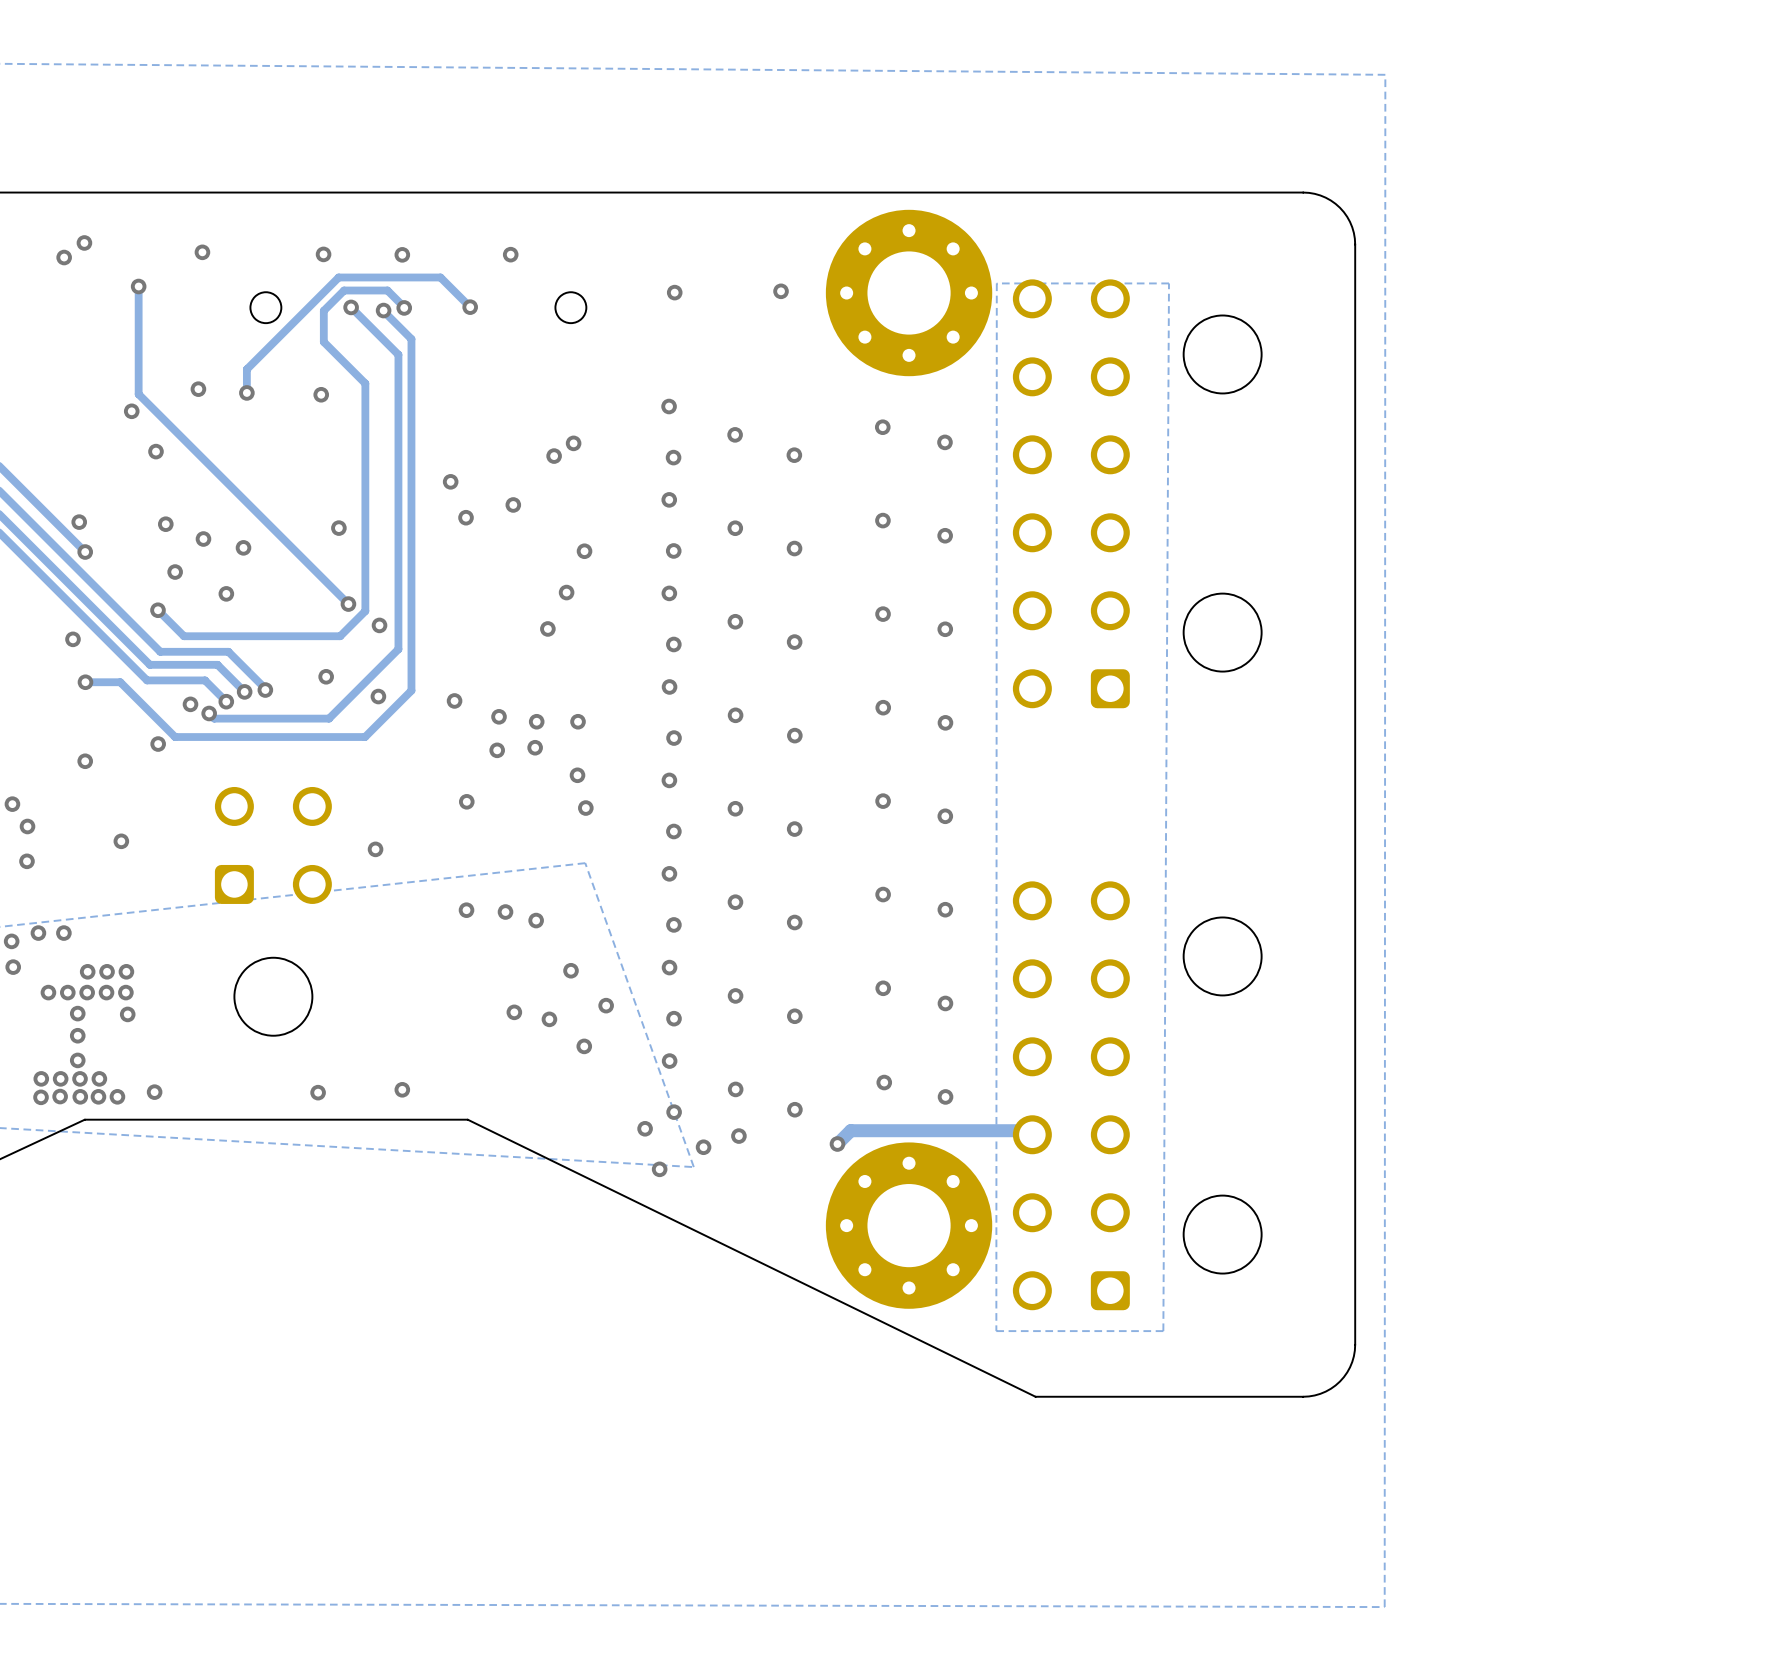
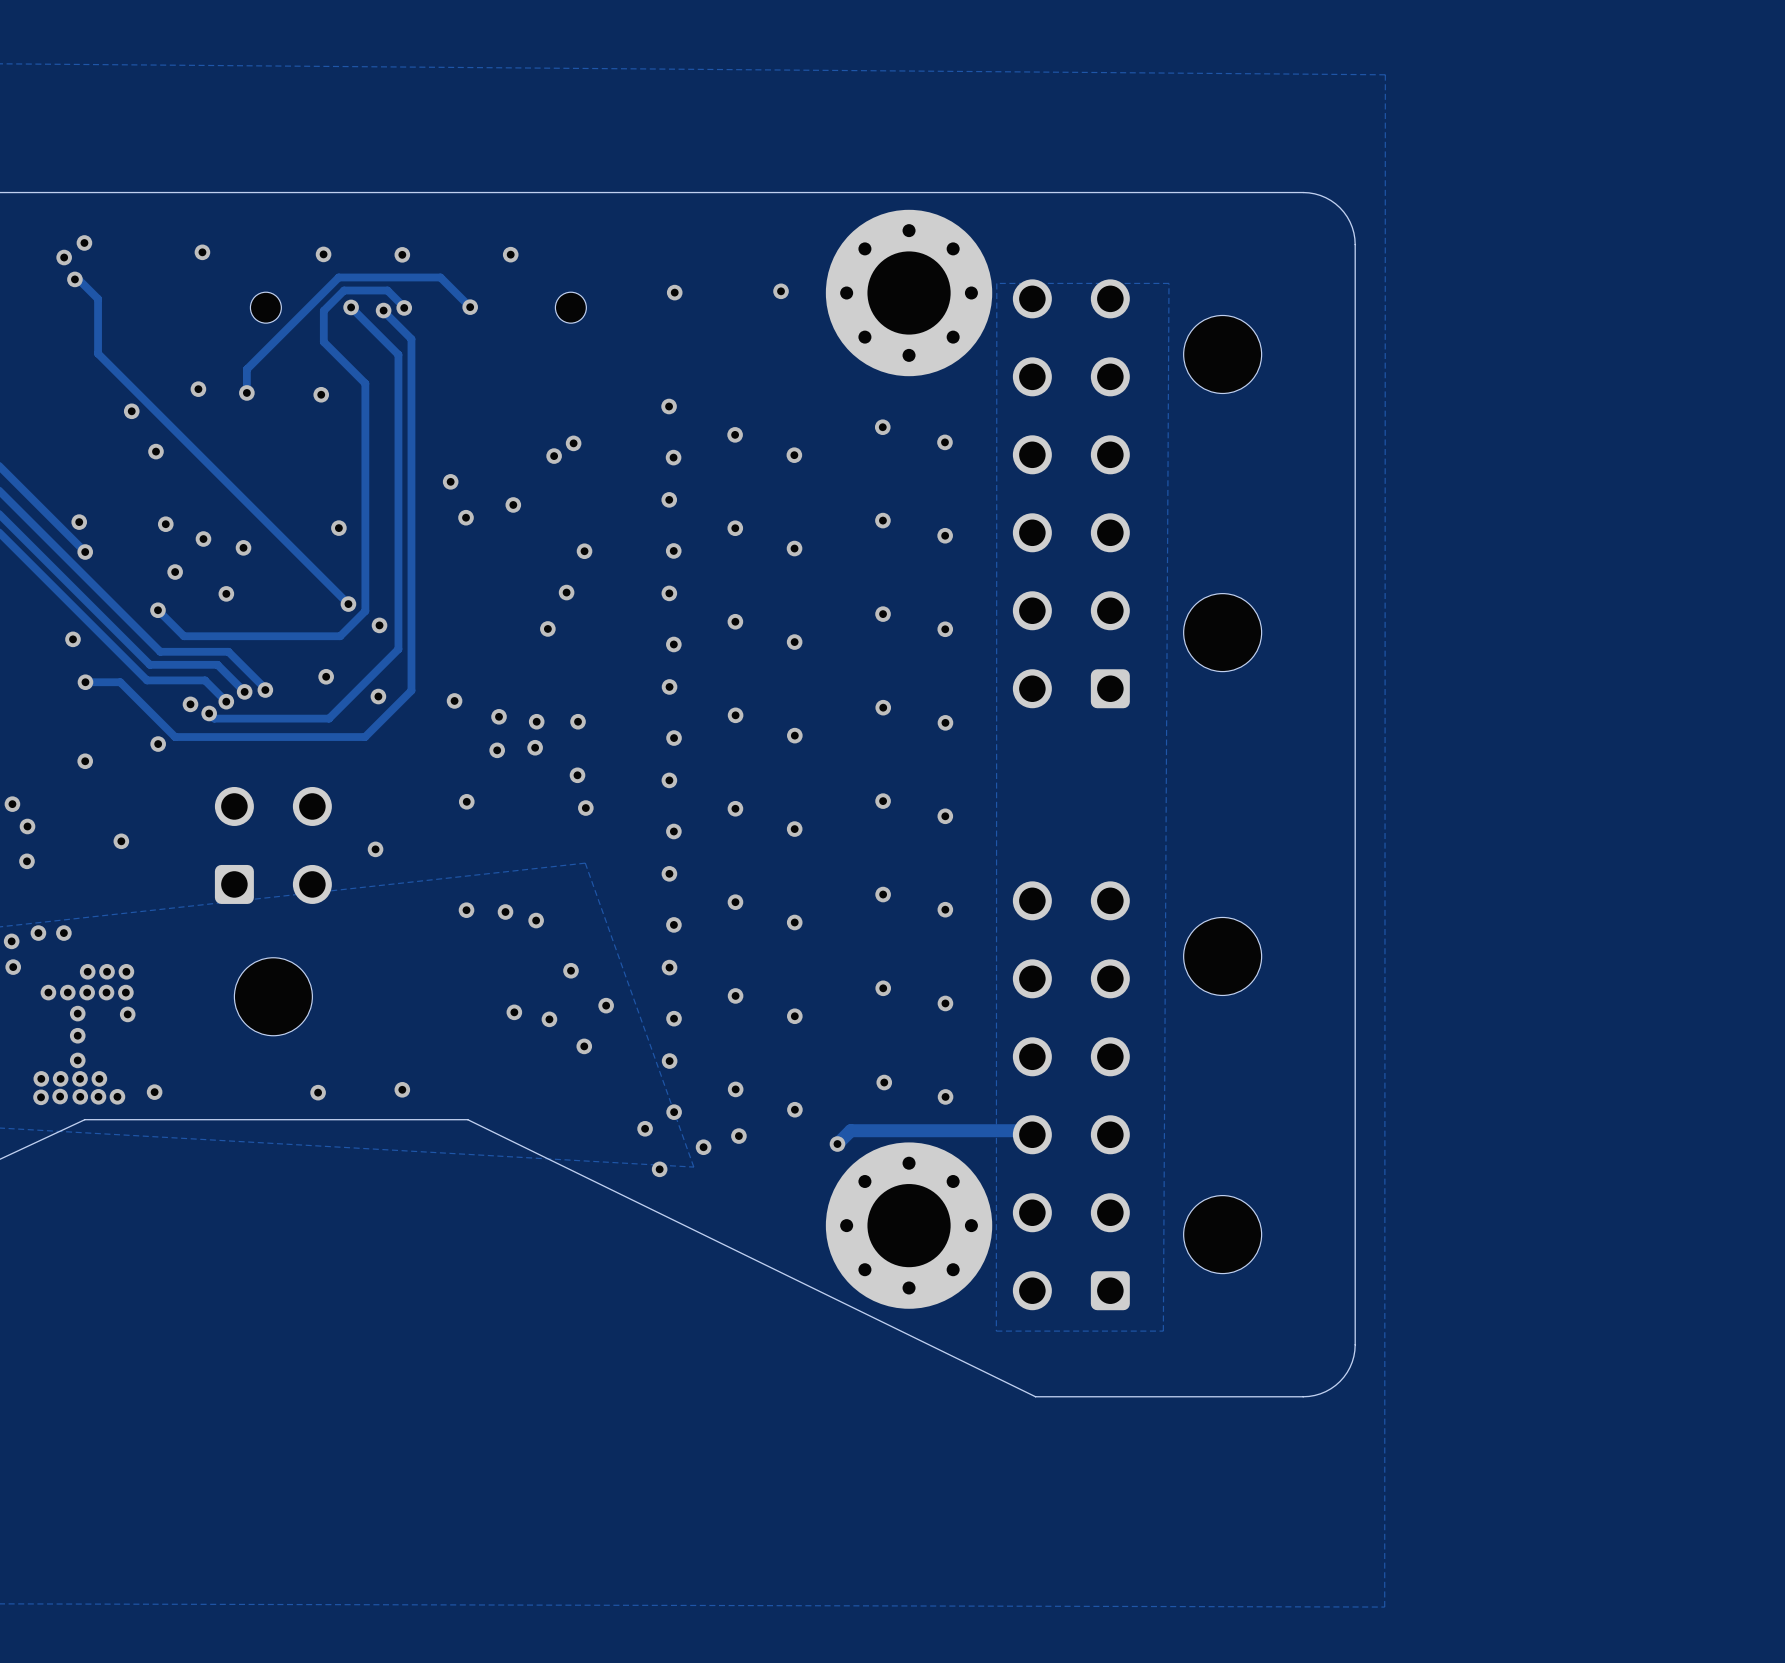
track: (138, 286) (138, 394) -> (74, 279) (78, 279) (98, 298) (98, 353) (138, 394)
via position: (138, 286) -> (74, 279)

